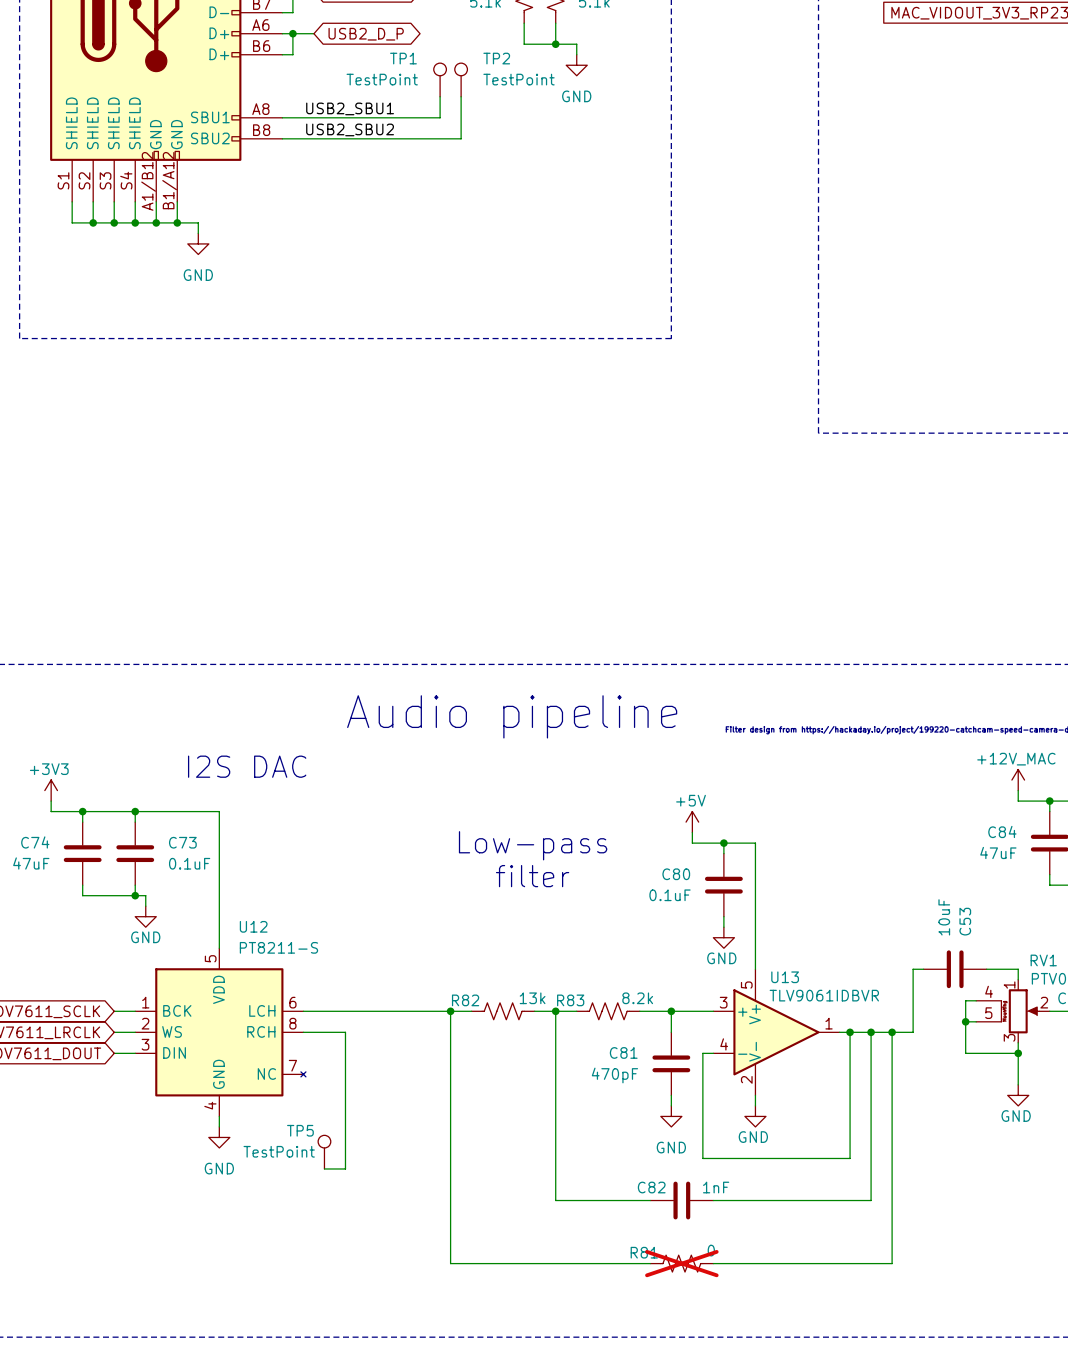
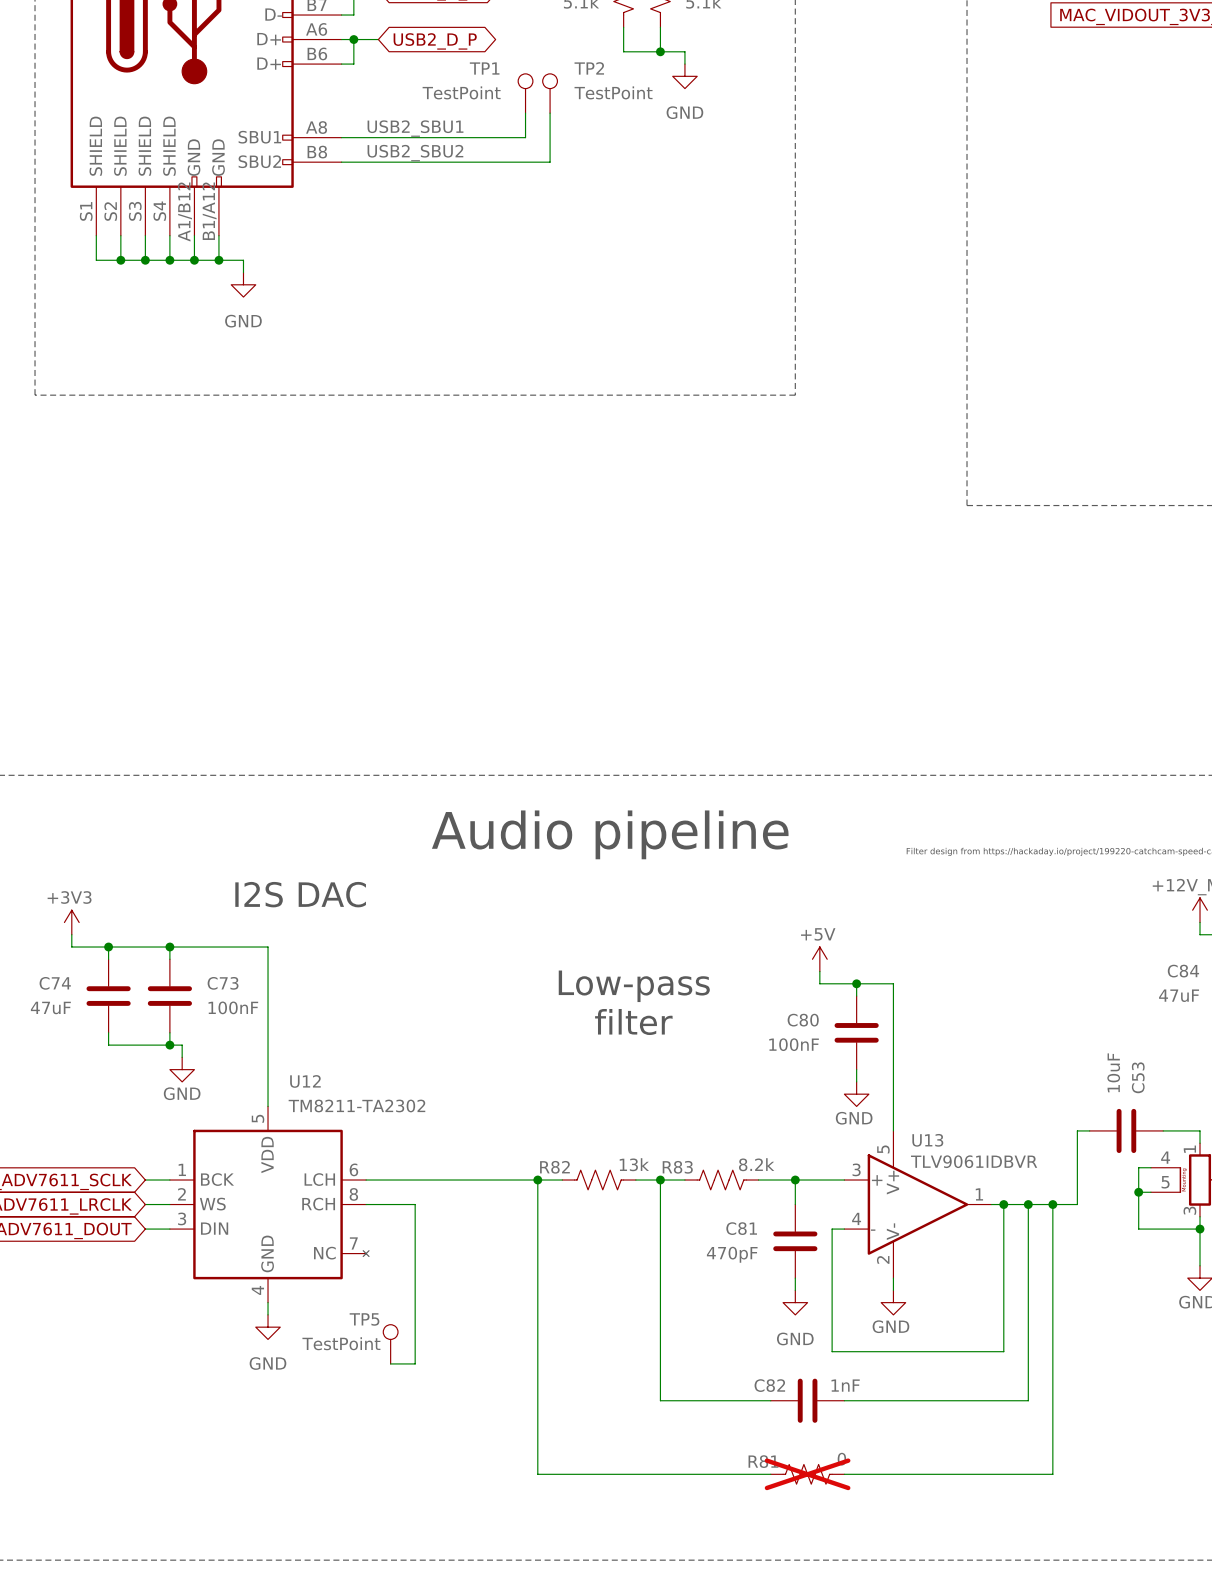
C73 value: 0.1uF (189, 863) -> 100nF (233, 1007)
C80 value: 0.1uF (670, 895) -> 100nF (794, 1044)
U12 value: PT8211-S (278, 947) -> TM8211-TA2302 (356, 1105)

